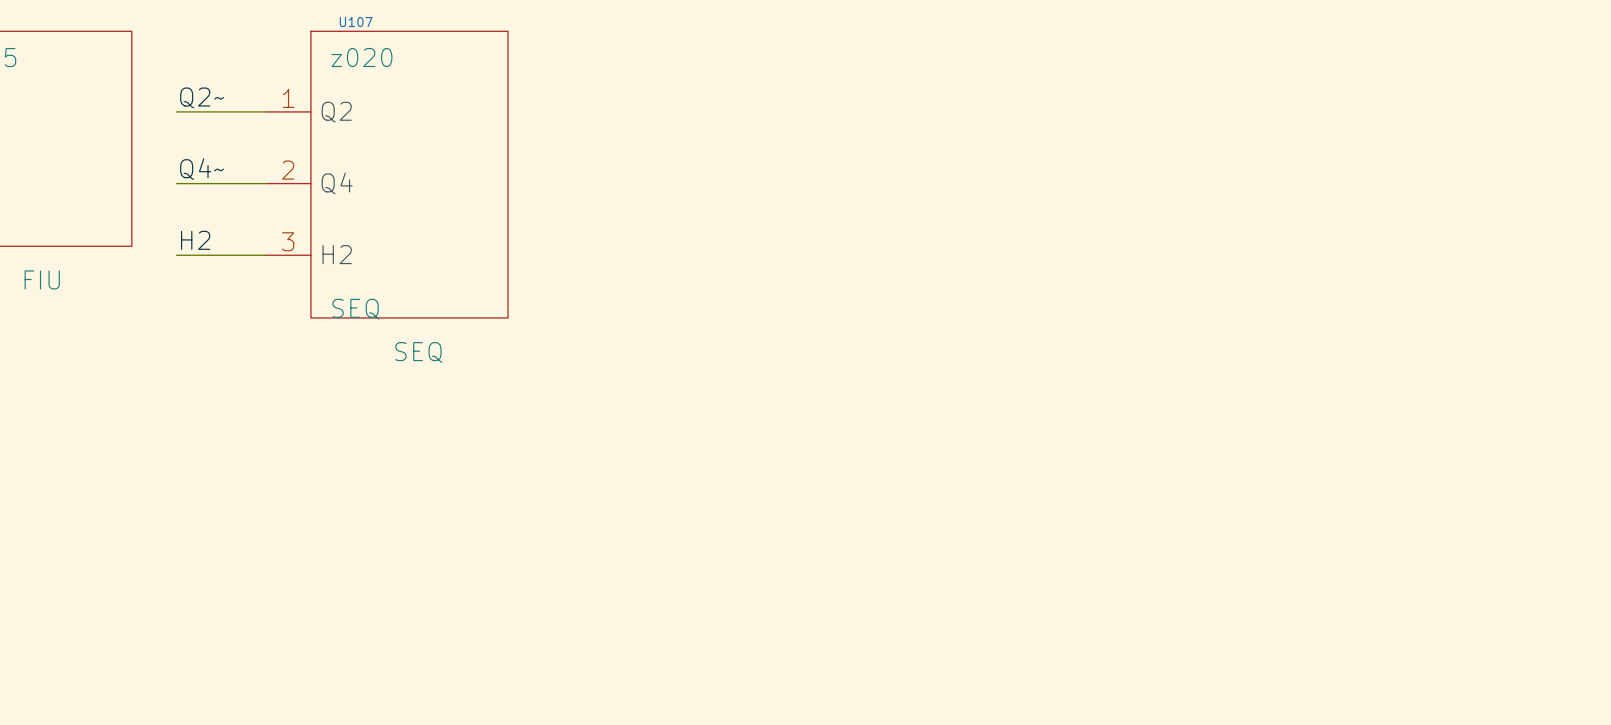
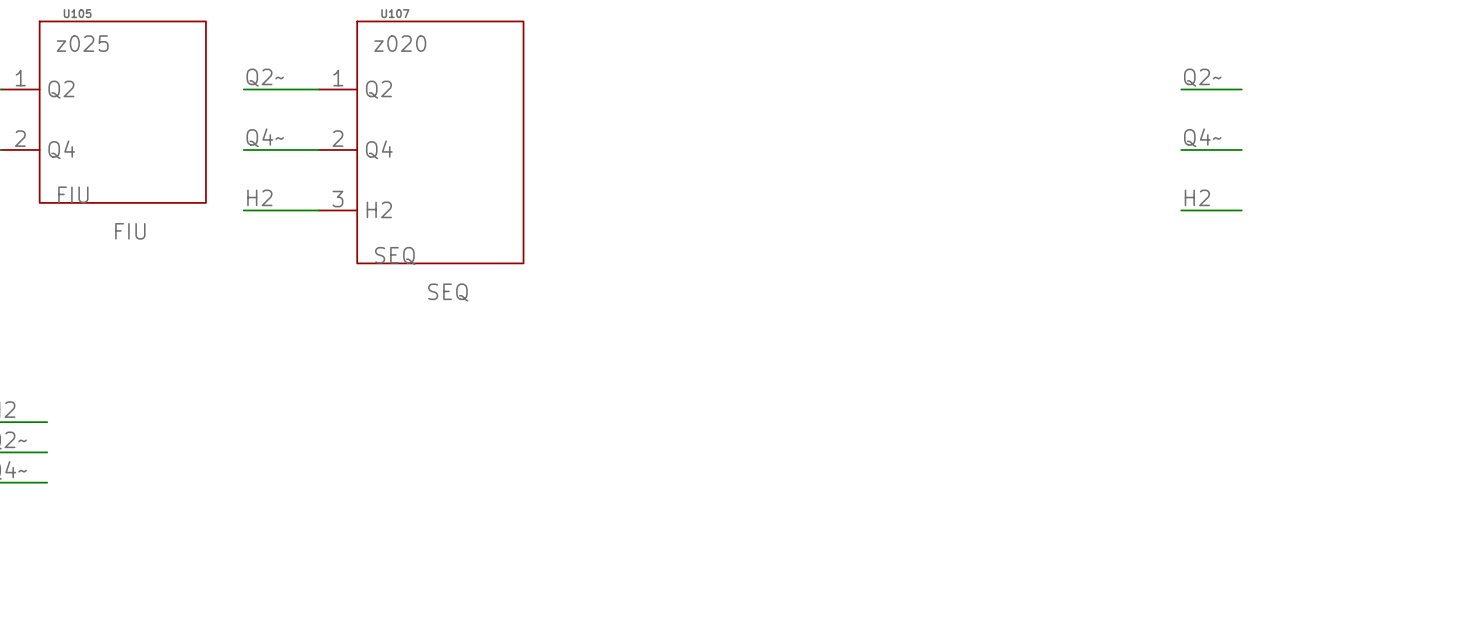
label: none -> Q2~ (1202, 77)
wire: none -> (1181, 89) (1241, 89)
label: none -> Q4~ (1202, 137)
wire: none -> (1181, 149) (1241, 149)
label: none -> H2 (1197, 197)
wire: none -> (1181, 210) (1241, 210)

